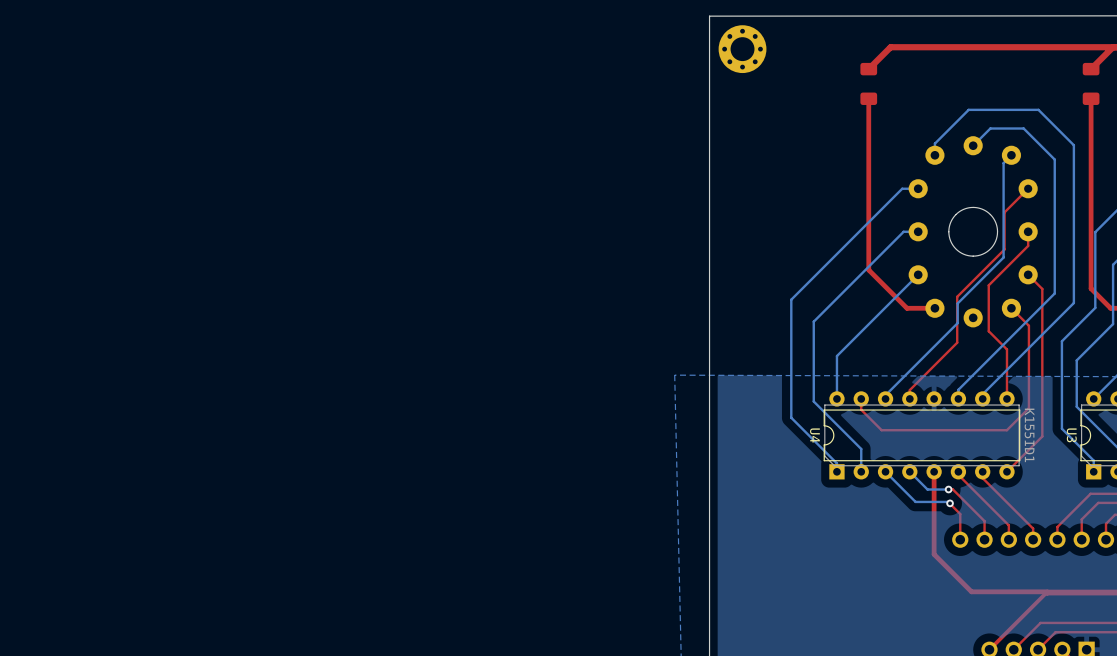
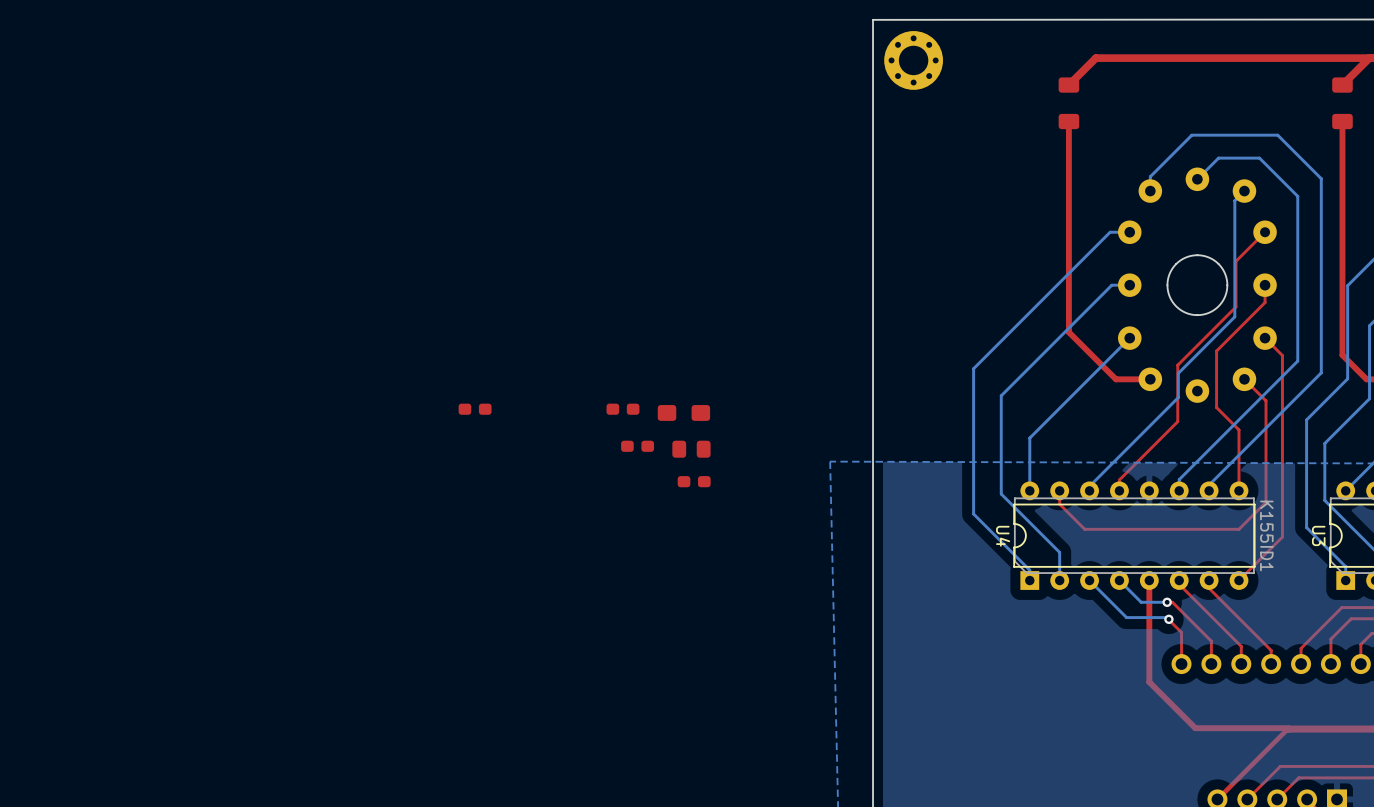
part: none -> (475, 409)
part: none -> (622, 409)
part: none -> (683, 412)
part: none -> (637, 446)
part: none -> (691, 449)
part: none -> (694, 481)

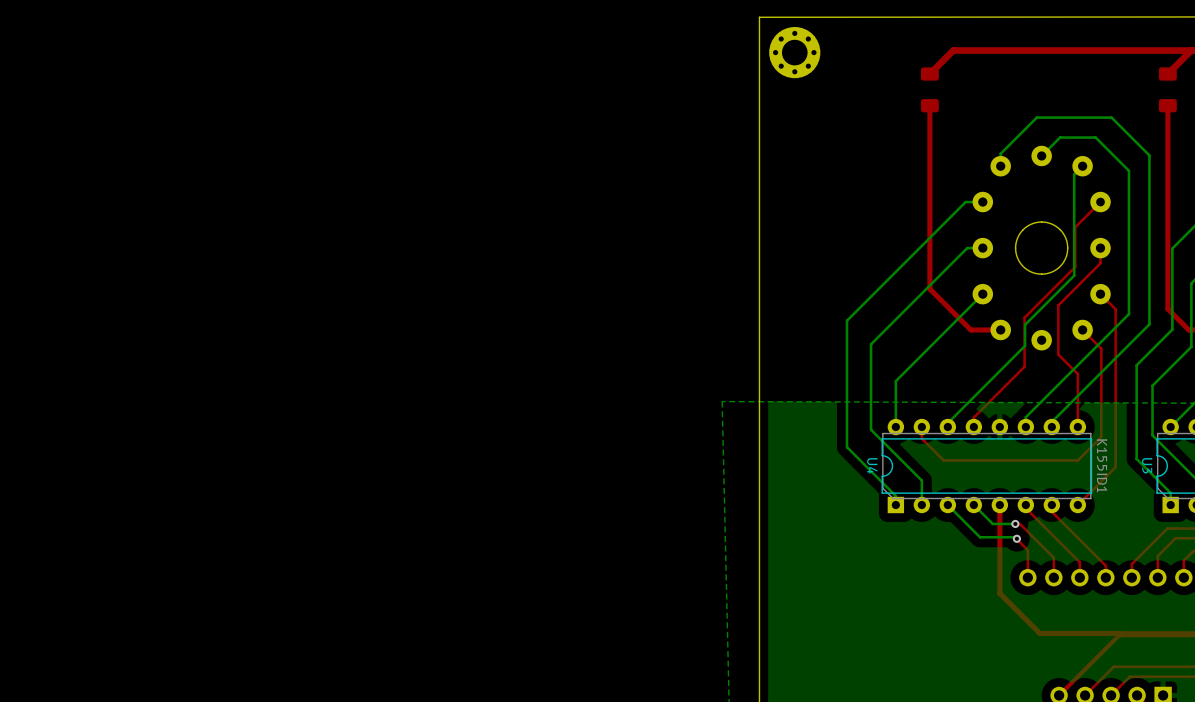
part: (475, 409) -> none
part: (622, 409) -> none
part: (683, 412) -> none
part: (637, 446) -> none
part: (691, 449) -> none
part: (694, 481) -> none

